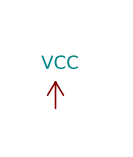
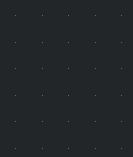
power symbol: VCC (55, 95) -> none

